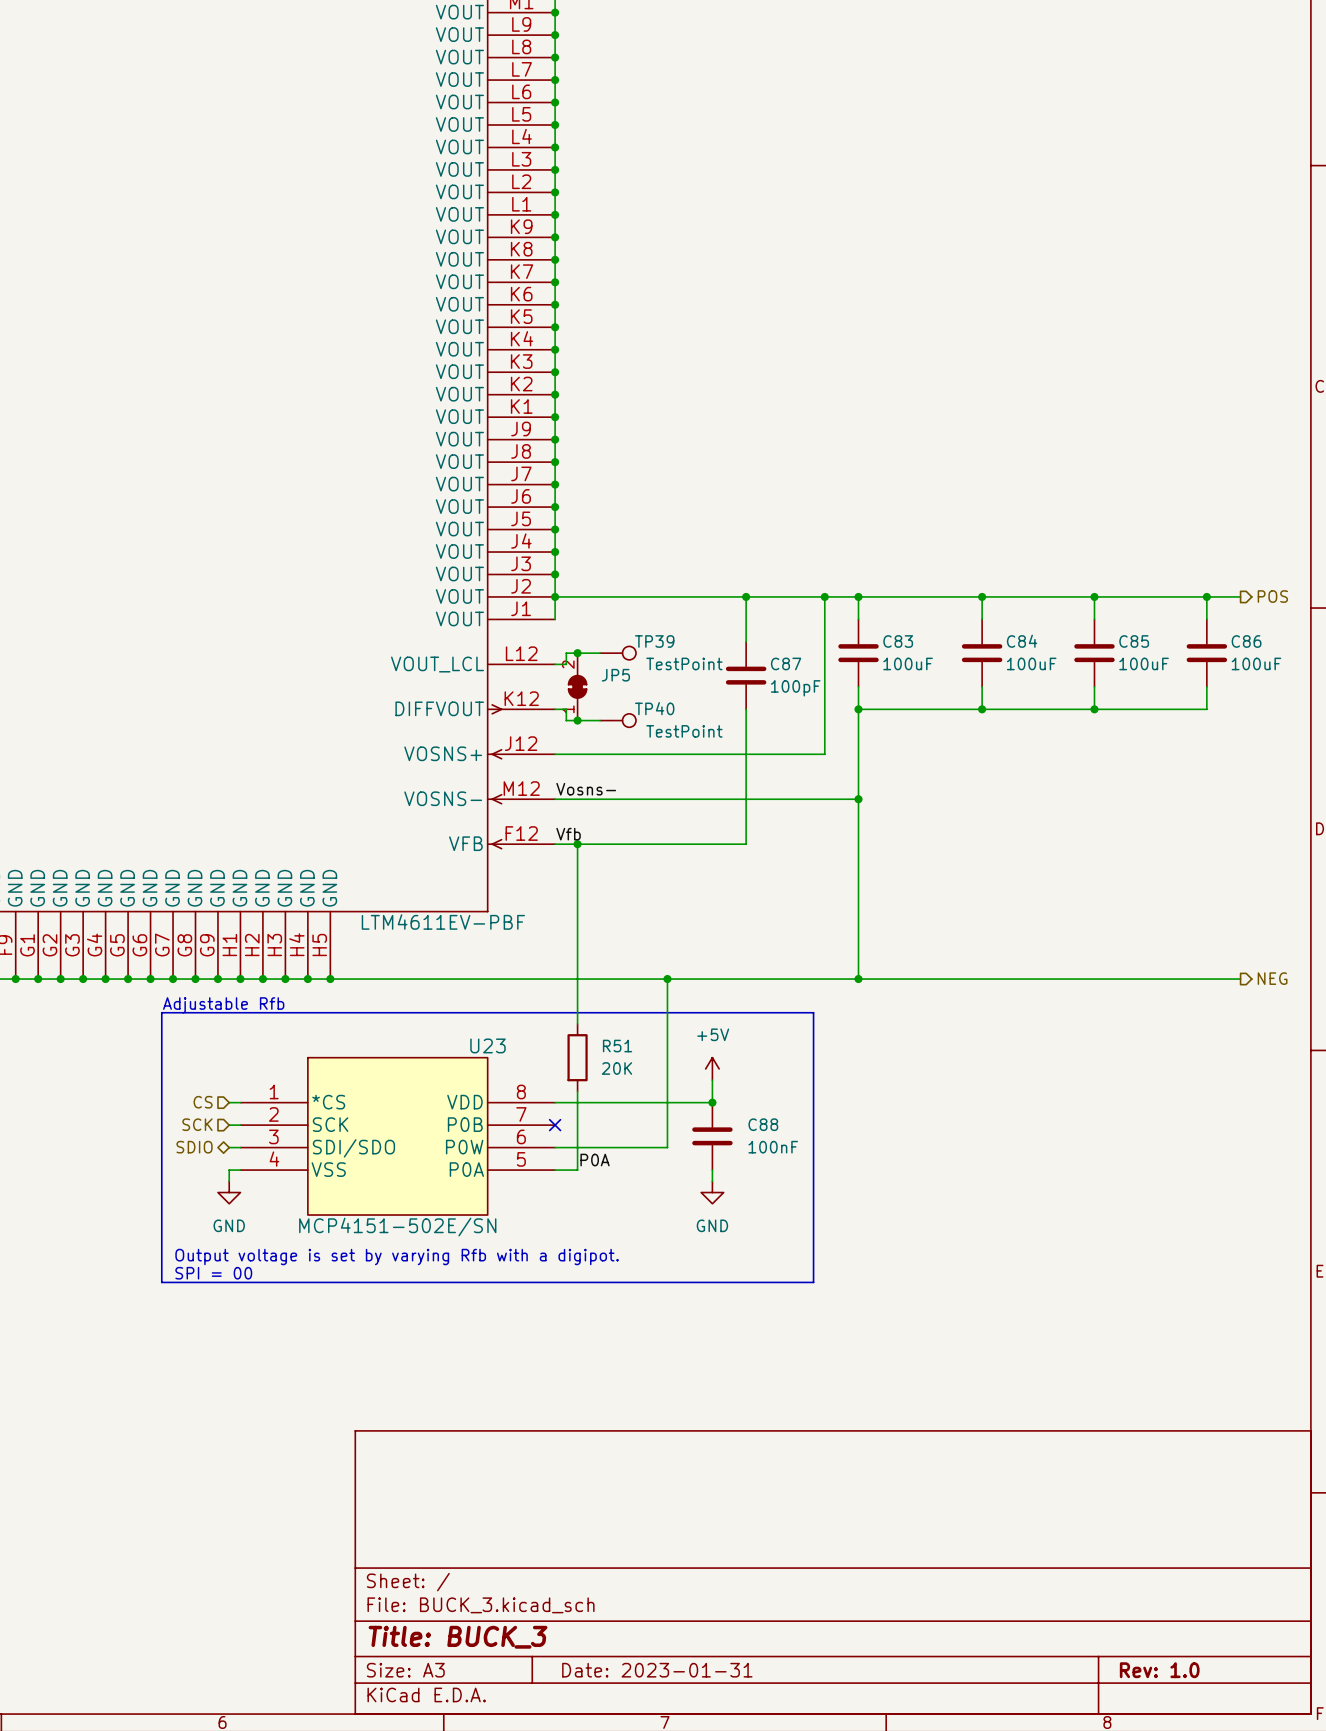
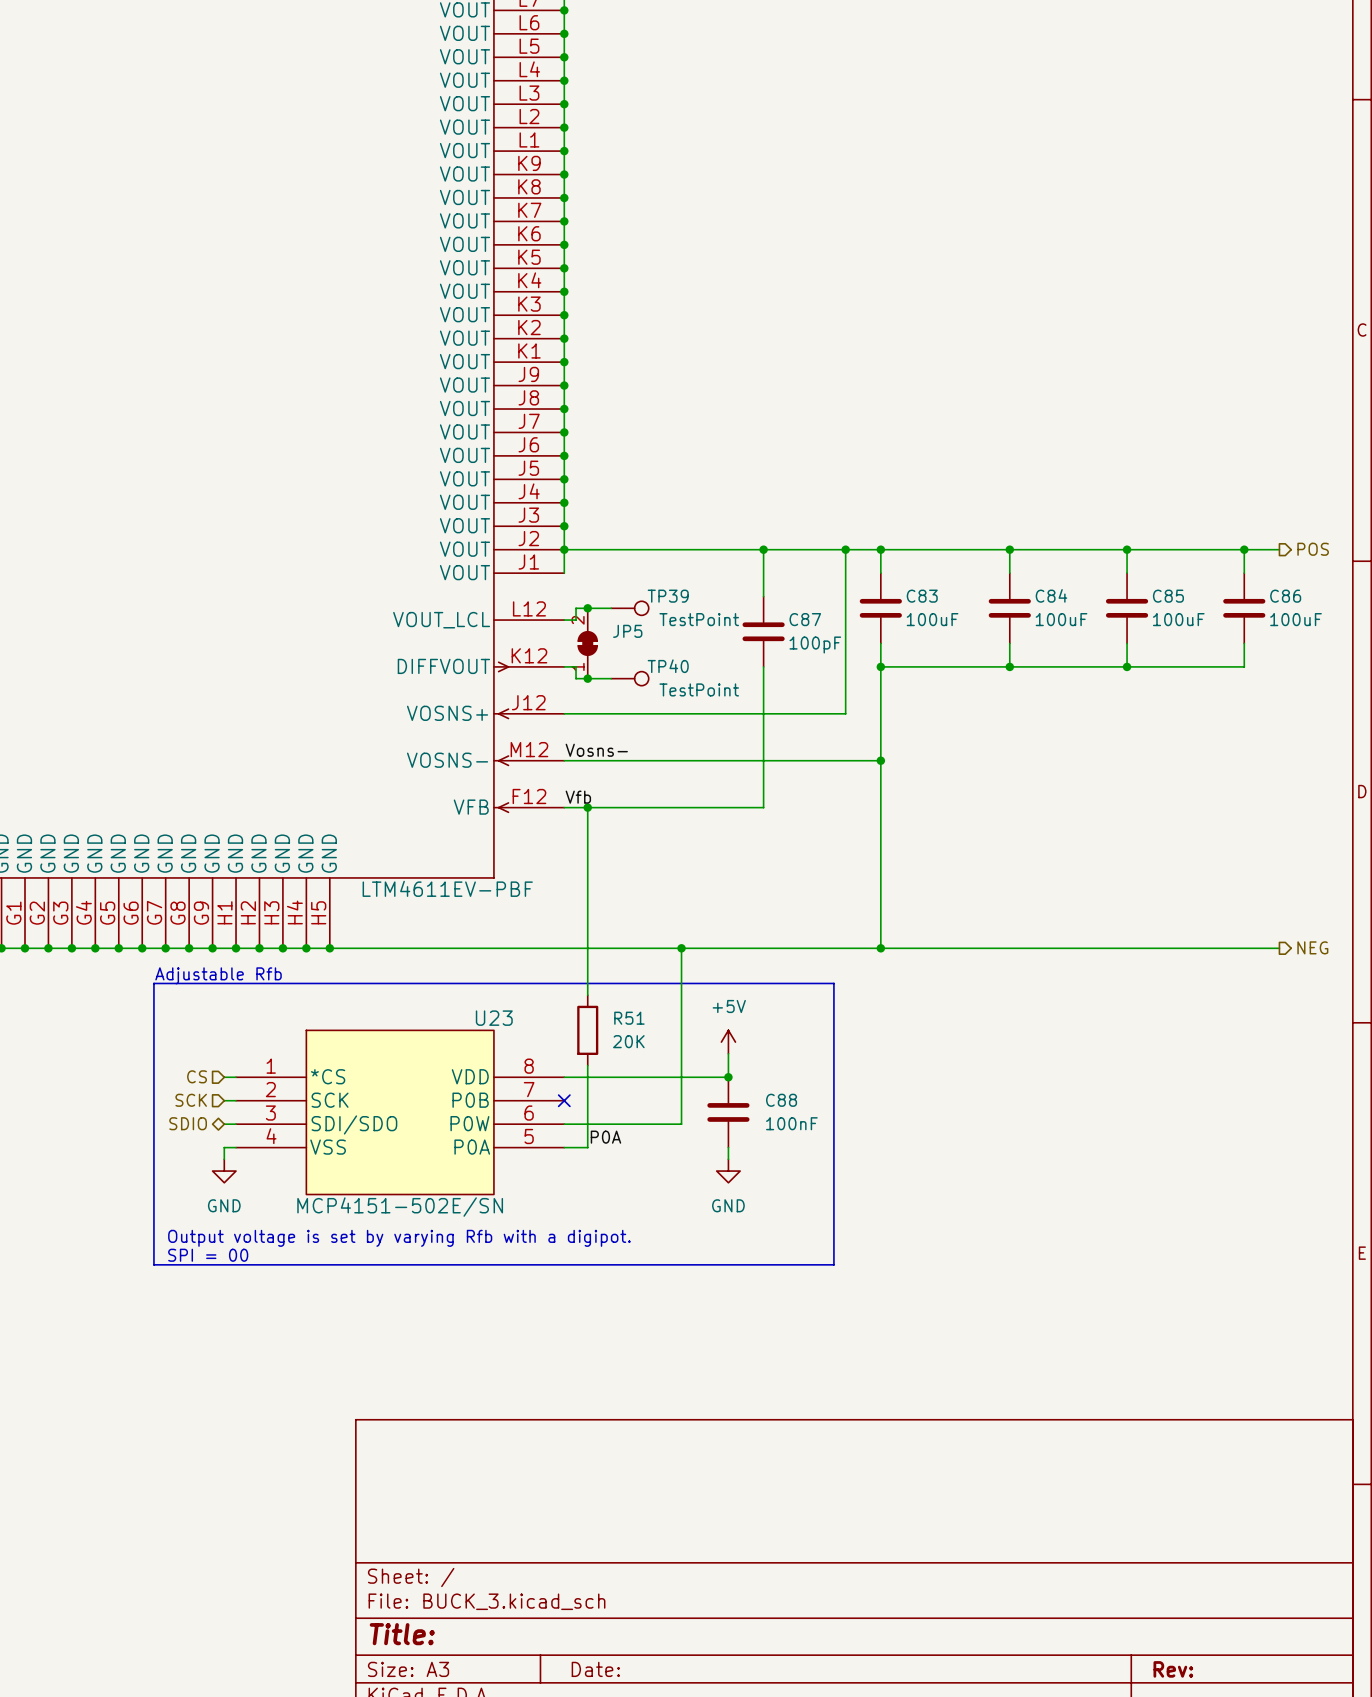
title block: Title: BUCK_3 (458, 1637) -> Title: (402, 1634)
title block: Date: 2023-01-31 (657, 1670) -> Date: (595, 1669)
title block: Rev: 1.0 (1159, 1670) -> Rev: (1173, 1669)

